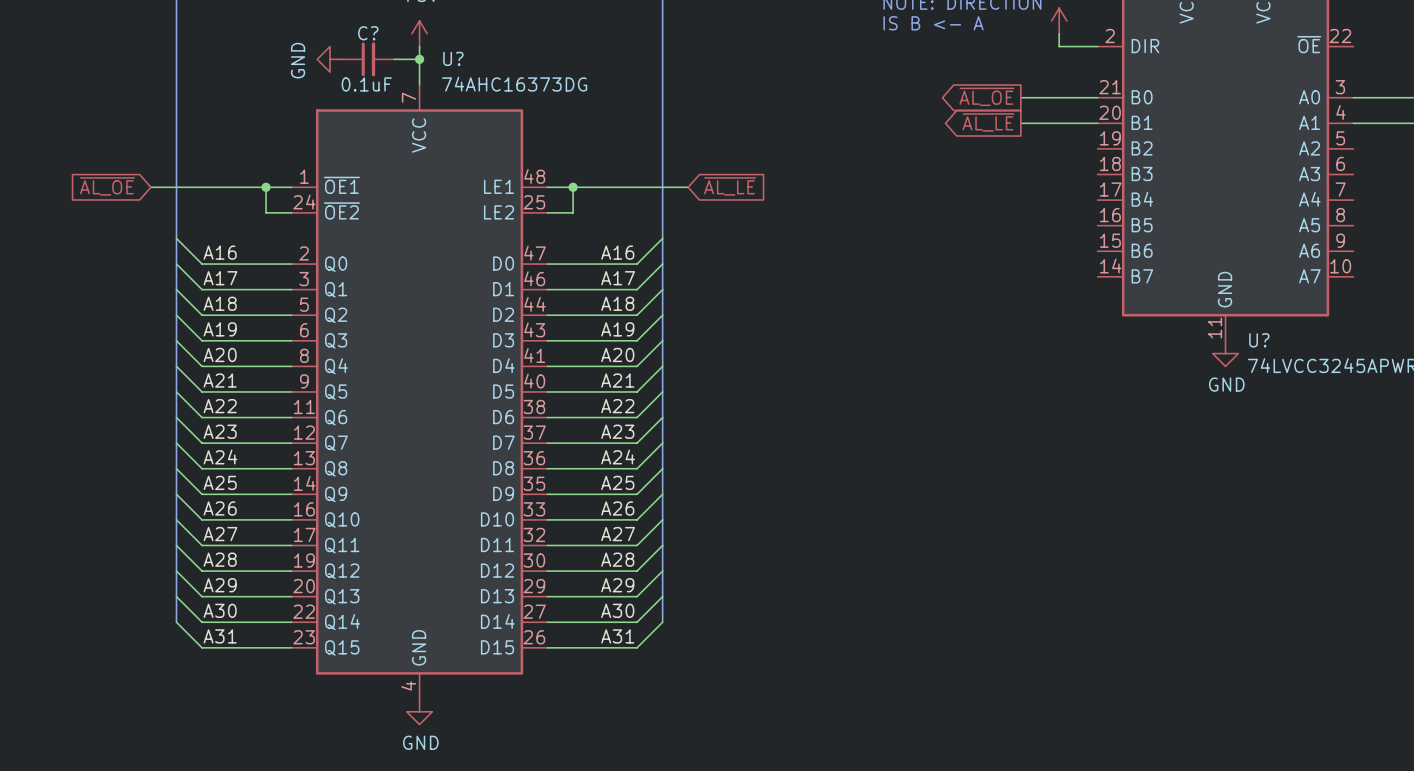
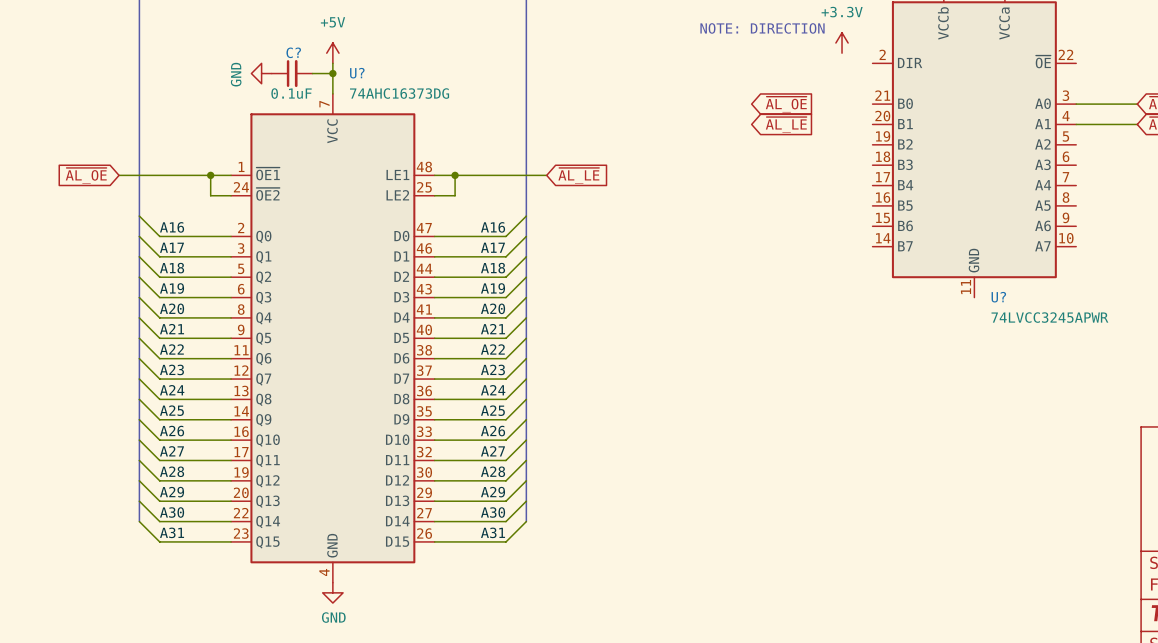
text: IS B <- A (933, 23) -> none
wire: (1059, 33) (1059, 46) (1097, 46) -> none
wire: (1020, 97) (1097, 97) -> none
wire: (1020, 123) (1097, 123) -> none
power symbol: GND (1225, 353) -> none

